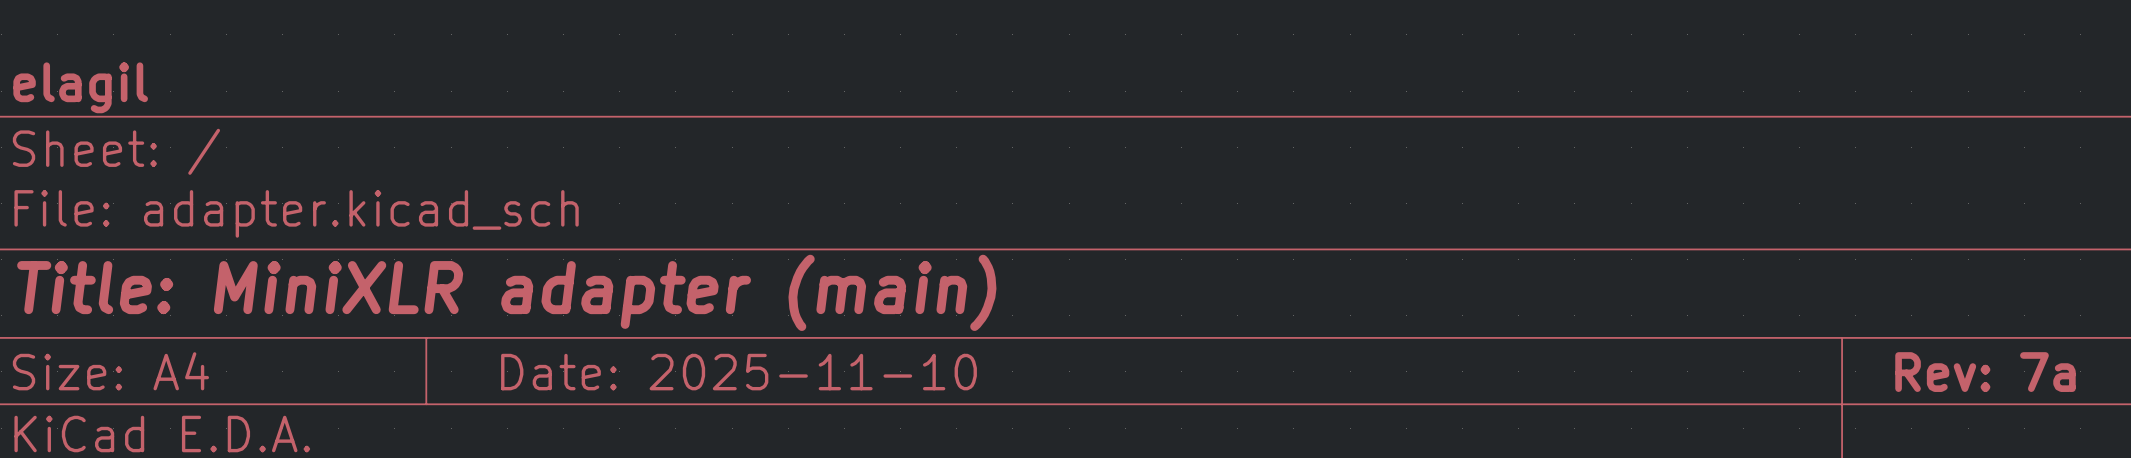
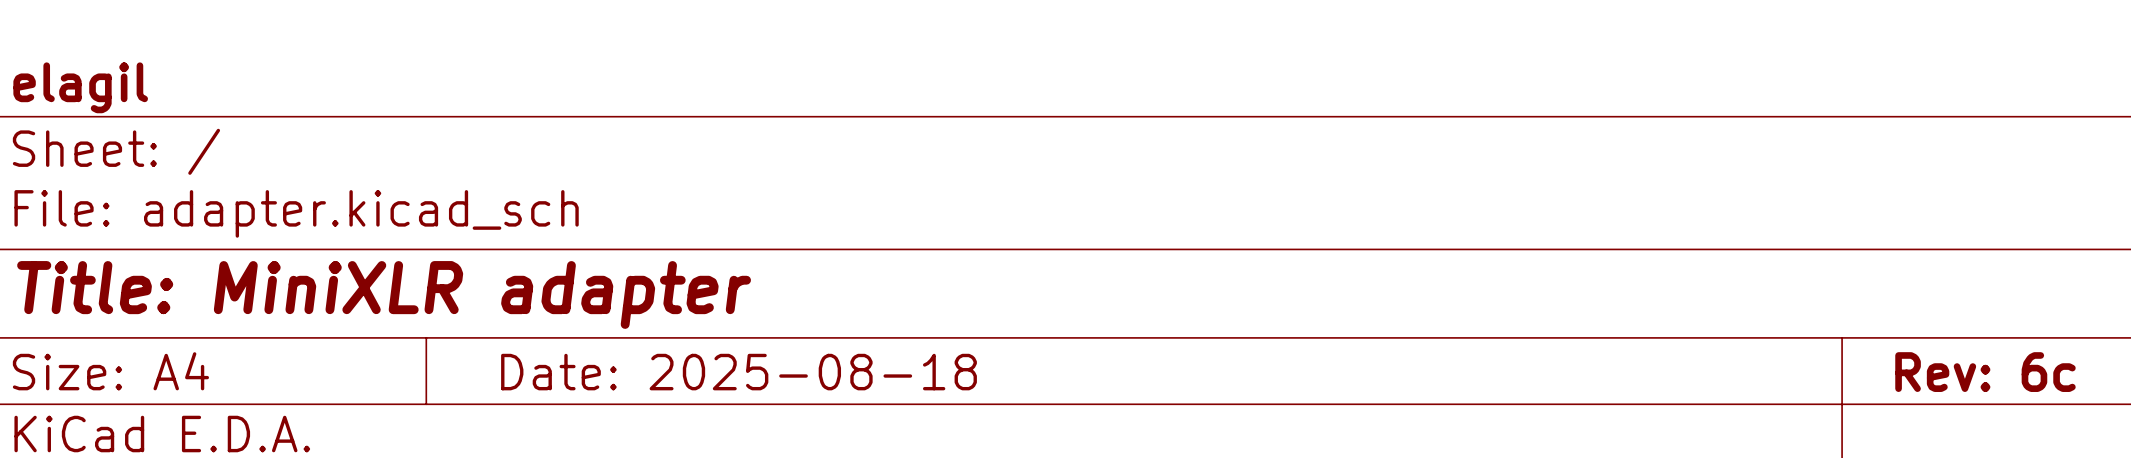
title block: Title: MiniXLR adapter (main) (506, 292) -> Title: MiniXLR adapter (384, 294)
title block: Date: 2025-11-10 (739, 372) -> Date: 2025-08-18 (739, 372)
title block: Rev: 7a (1985, 372) -> Rev: 6c (1985, 372)

